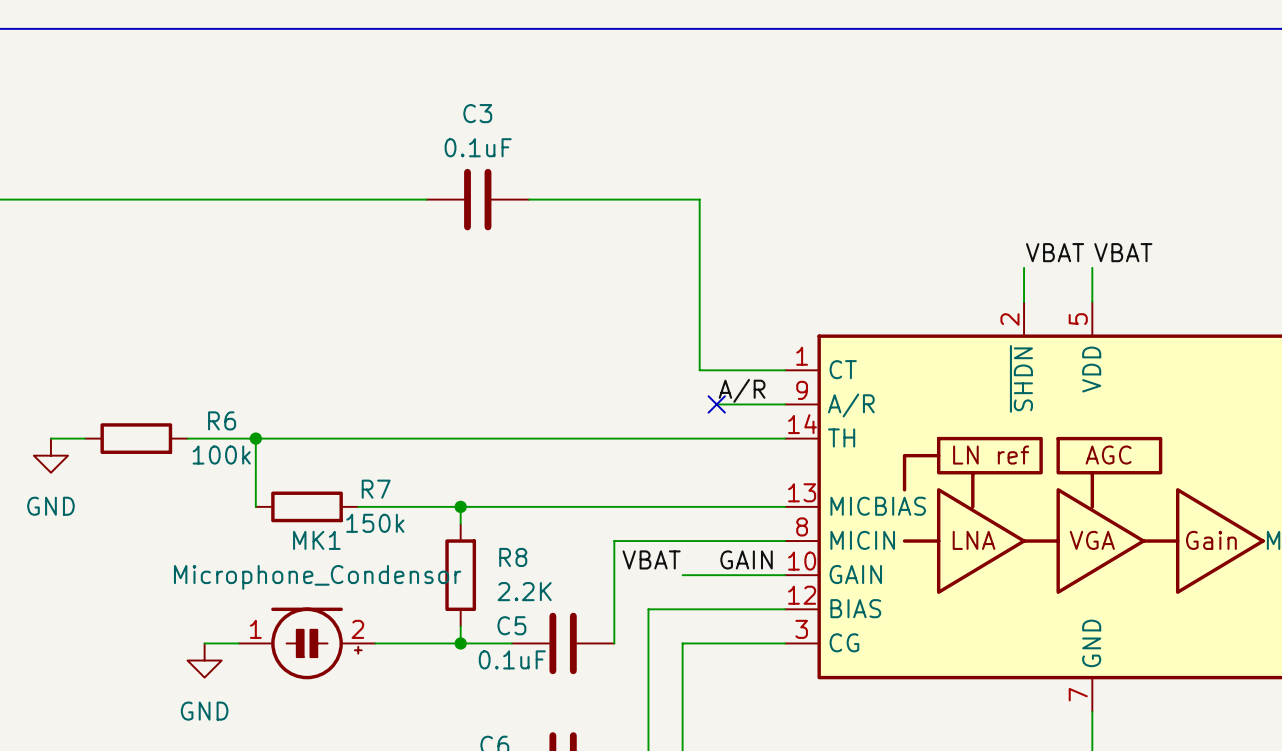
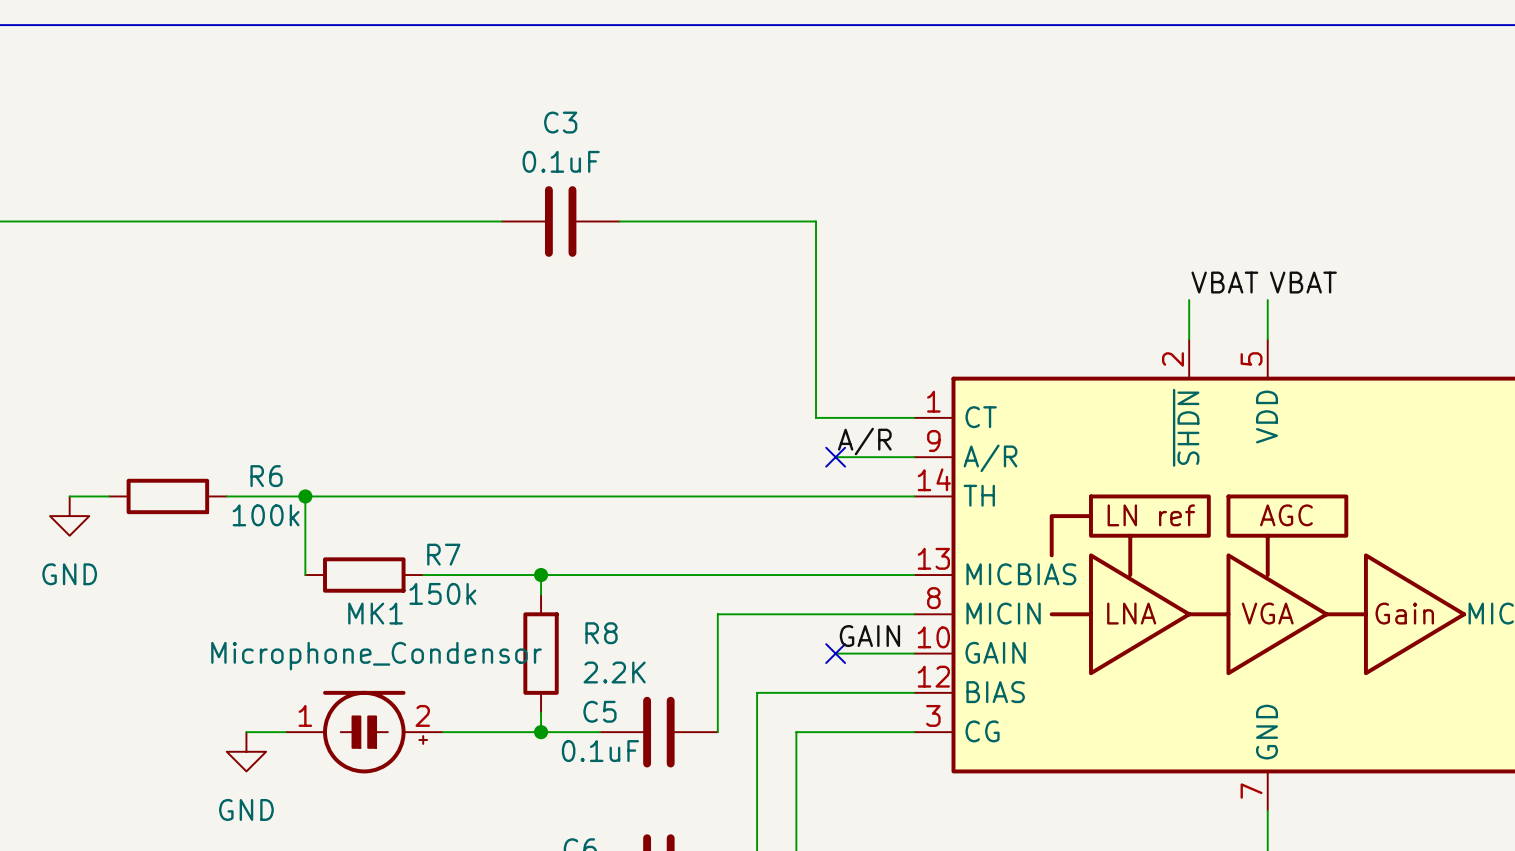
label: VBAT (651, 559) -> none
wire: (682, 575) (716, 575) -> none
no-connect mark: none -> (835, 653)

